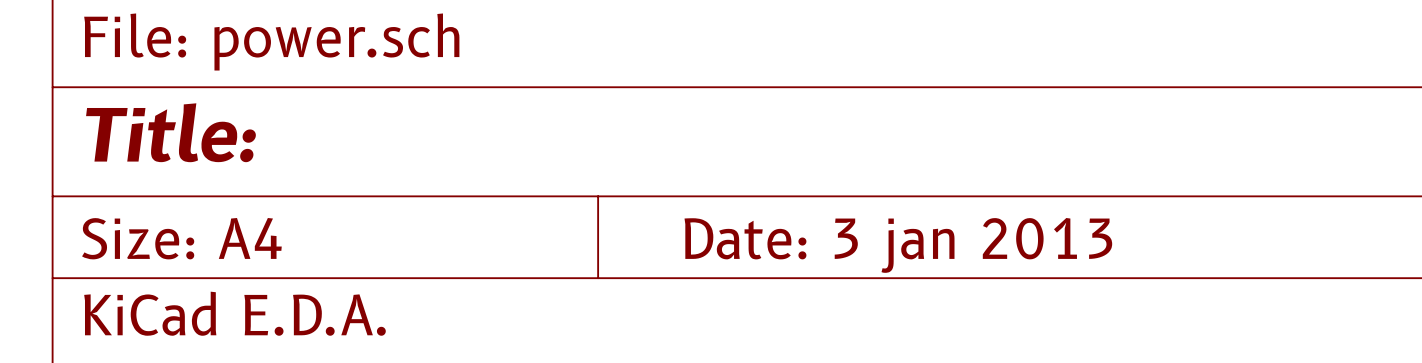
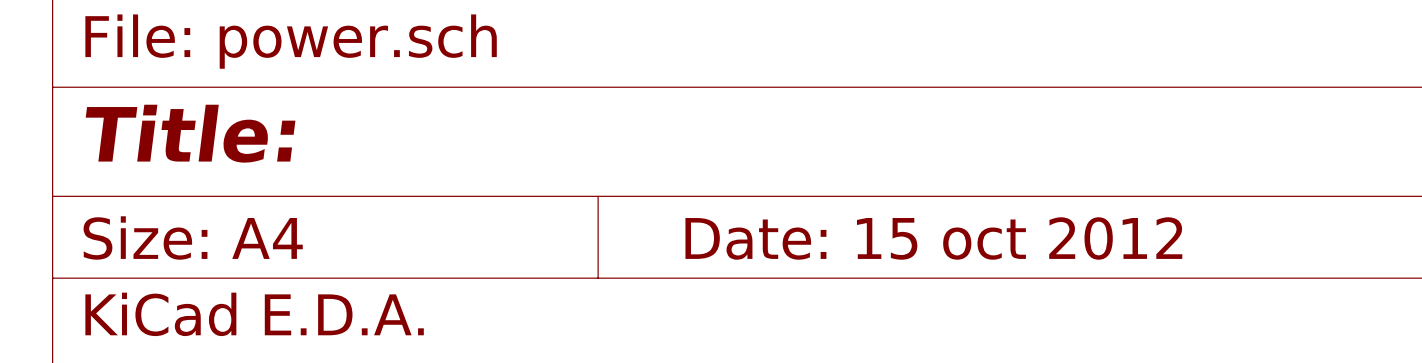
title block: Date: 3 jan 2013 (898, 245) -> Date: 15 oct 2012 (933, 238)

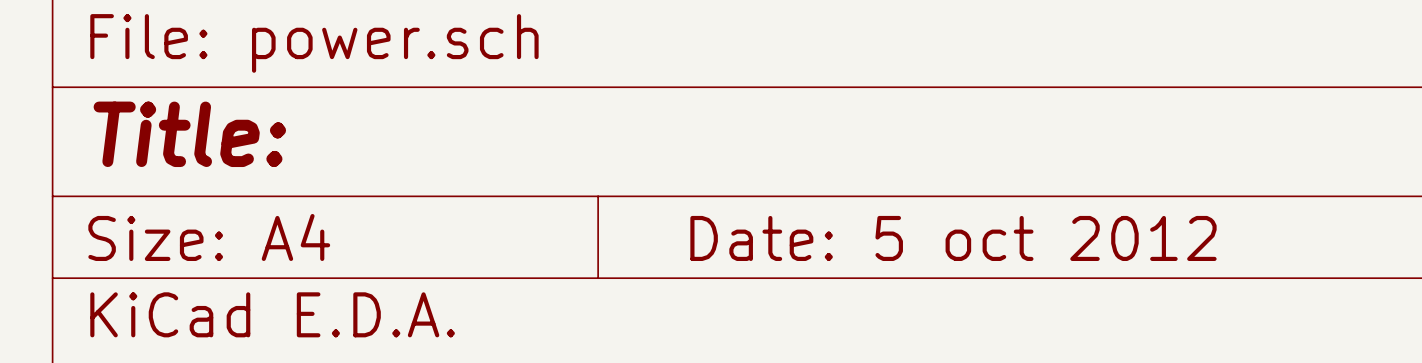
title block: Date: 15 oct 2012 (933, 238) -> Date: 5 oct 2012 (953, 238)

